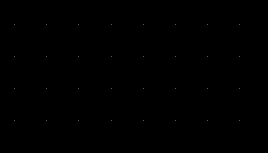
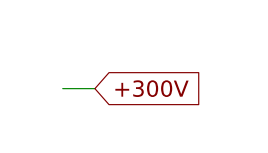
wire: none -> (62, 88) (94, 88)
global label: none -> +300V (151, 88)

